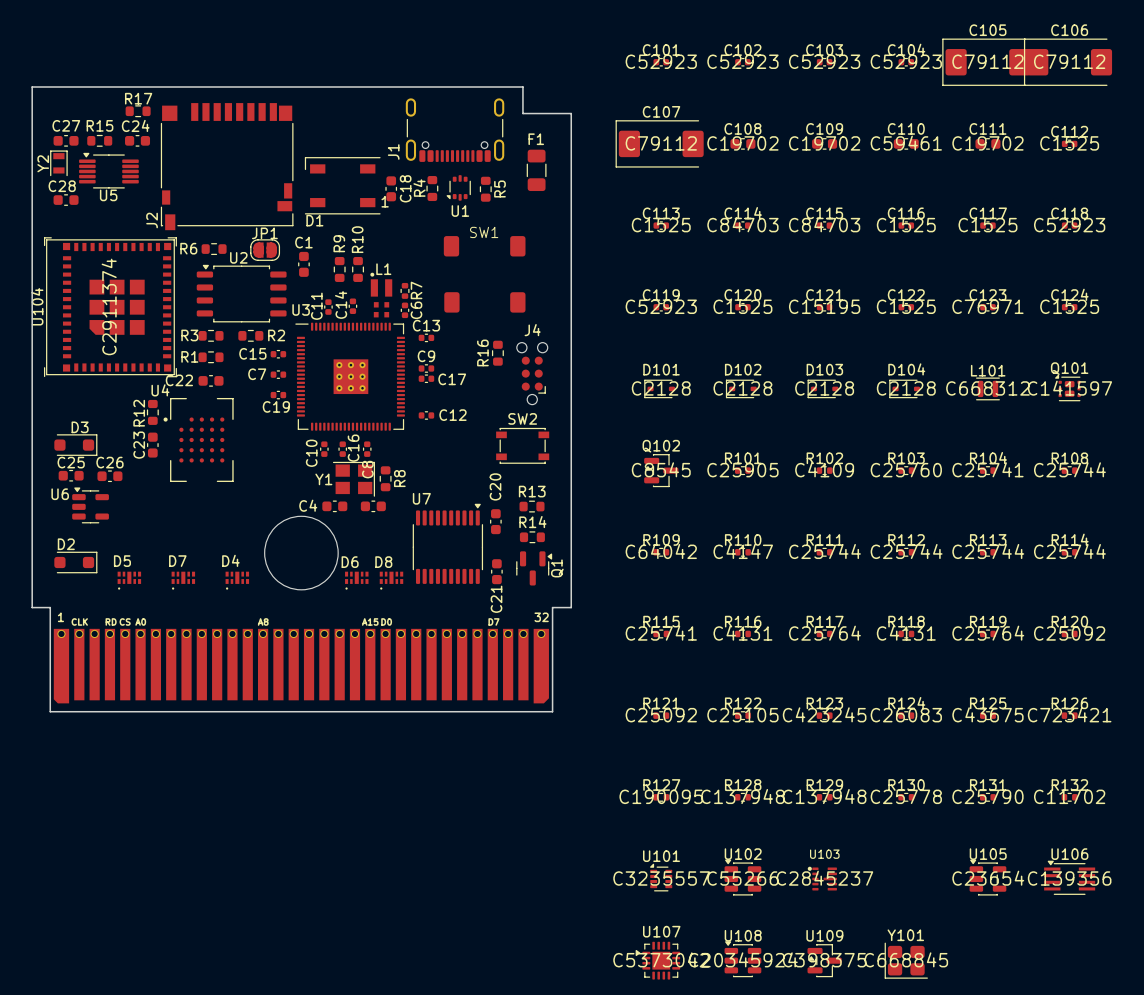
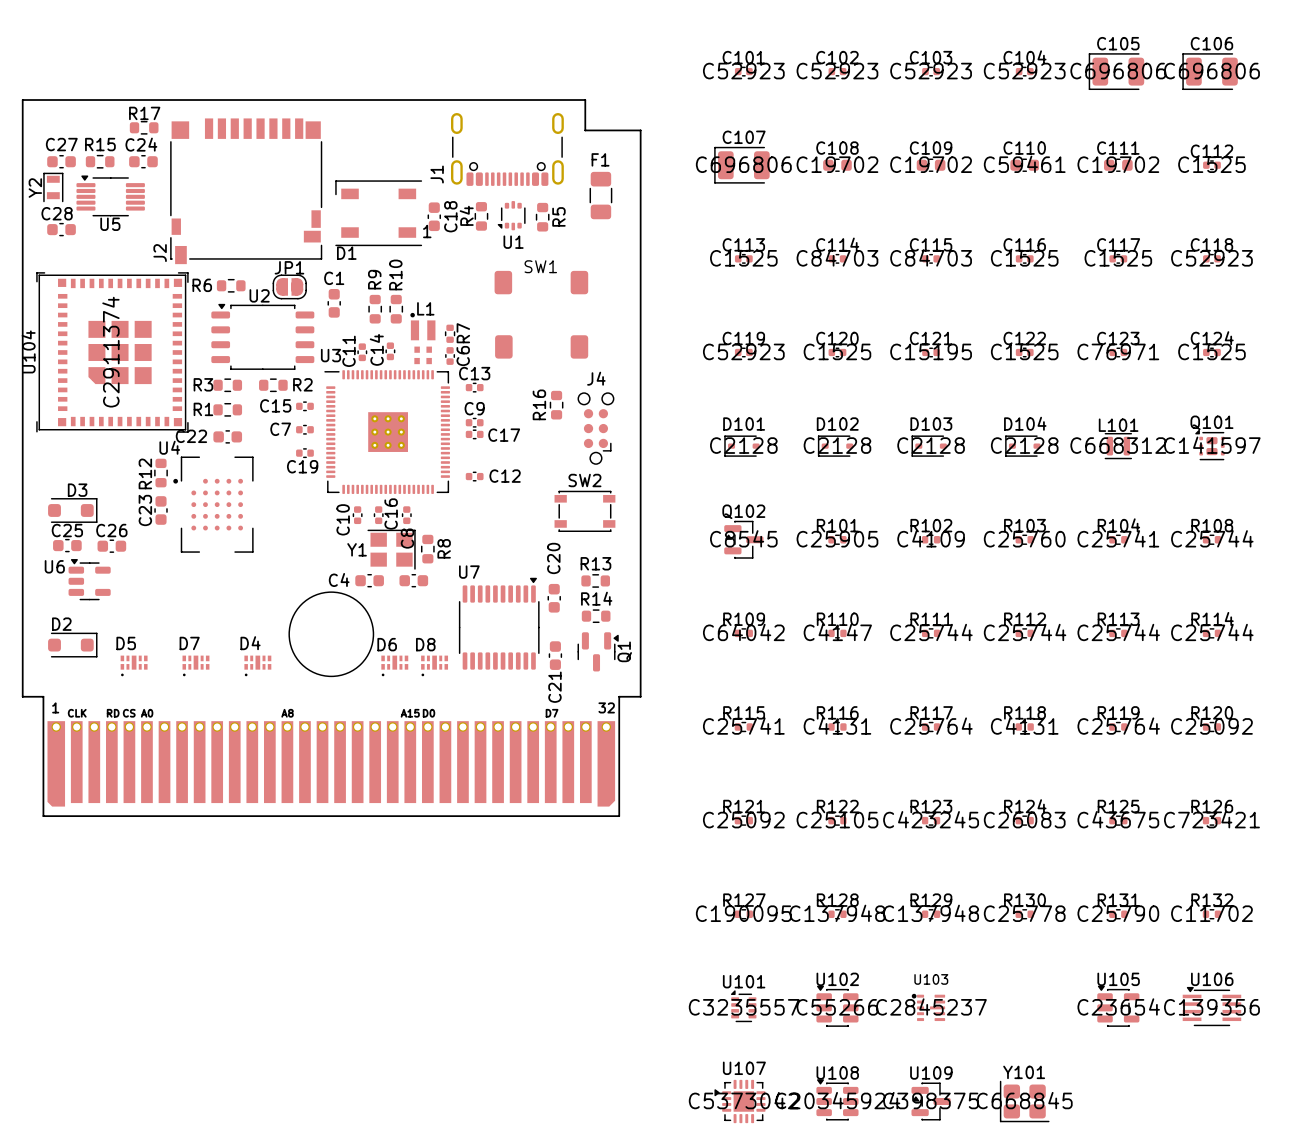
C105 footprint: [942, 38, 1031, 86] -> [1088, 53, 1145, 90]
C106 footprint: [1023, 38, 1113, 86] -> [1182, 53, 1238, 90]
C105 text: C79112 (987, 61) -> C696806 (1118, 71)
C106 text: C79112 (1069, 61) -> C696806 (1211, 71)
C107 footprint: [615, 120, 704, 168] -> [714, 146, 770, 184]
C107 text: C79112 (661, 143) -> C696806 (743, 164)

